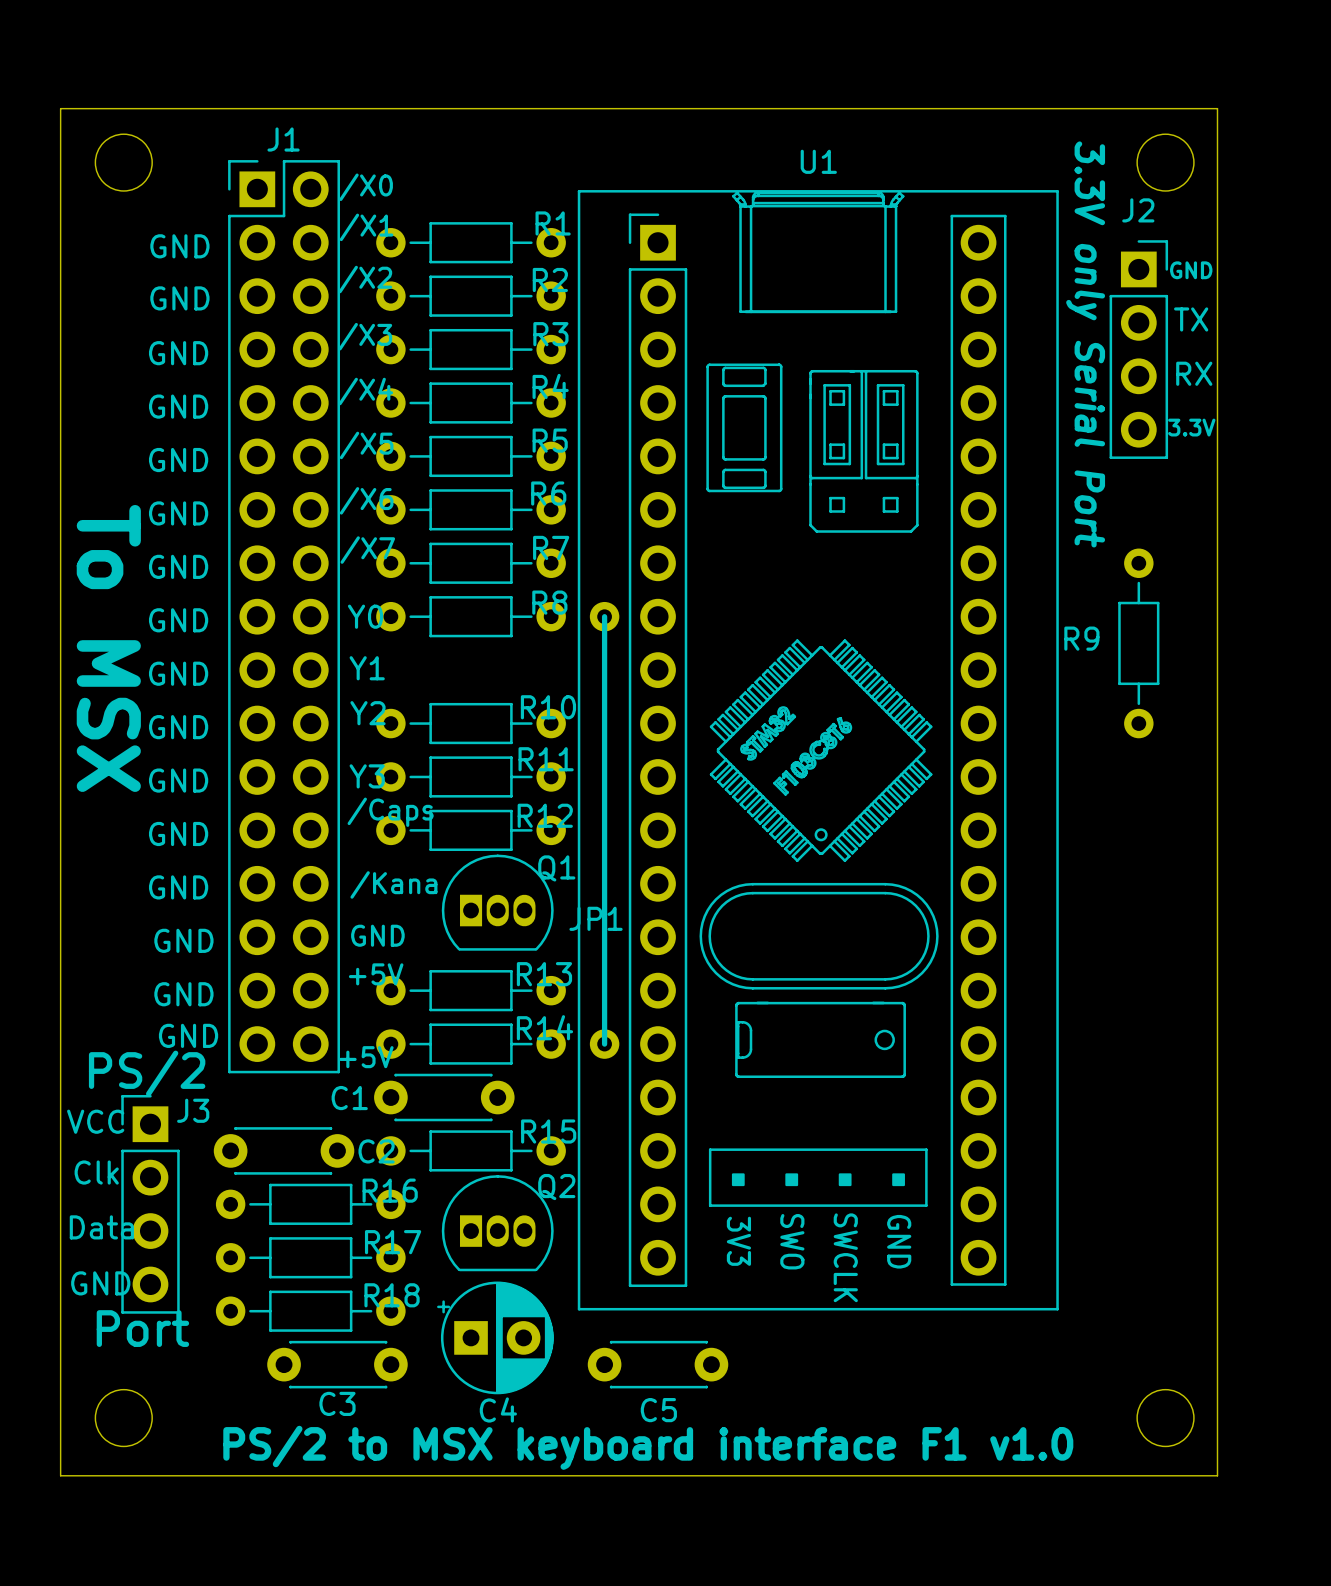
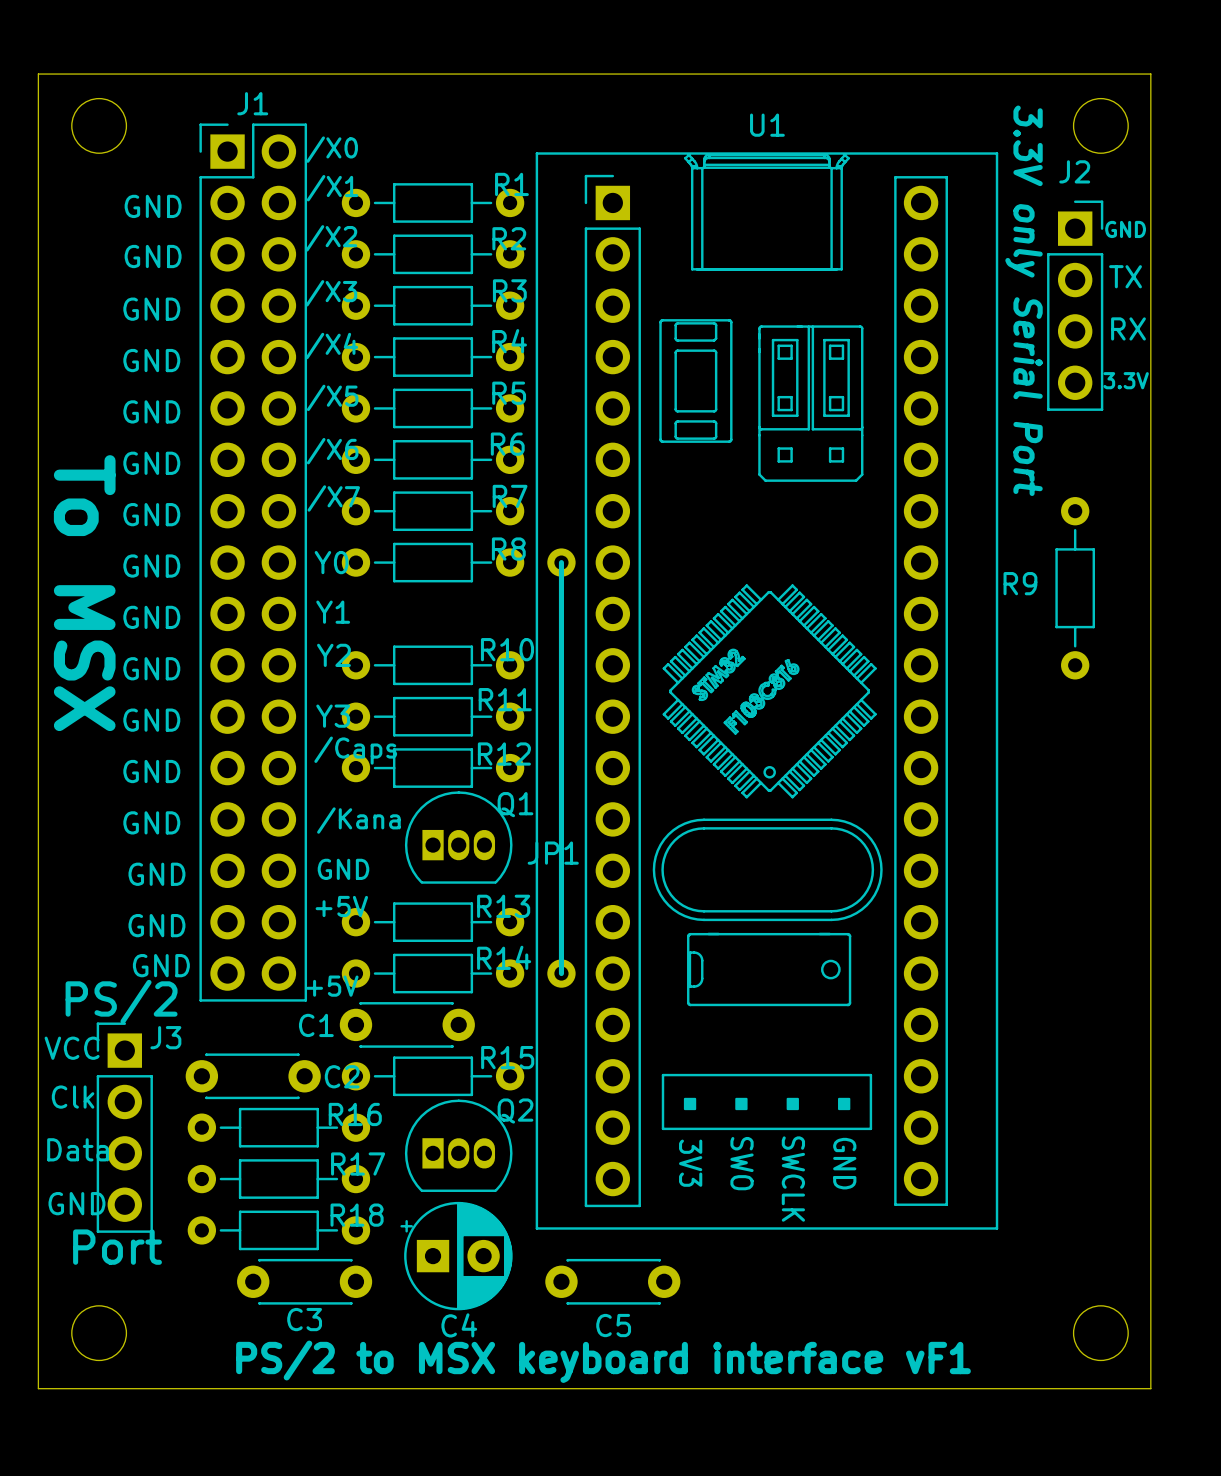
text: PS/2 to MSX keyboard interface F1 v1.0 (648, 1447) -> PS/2 to MSX keyboard interface vF1 (603, 1361)

